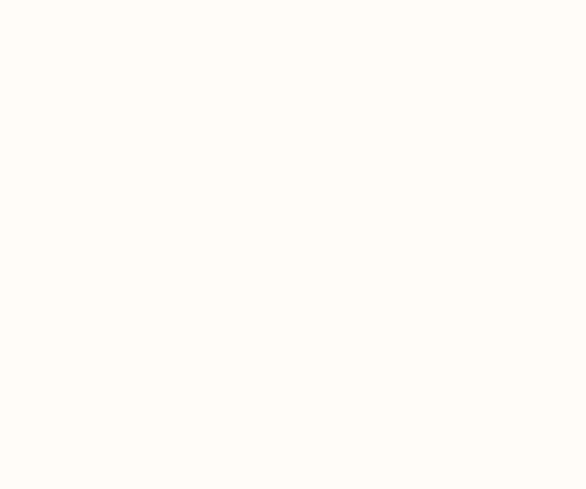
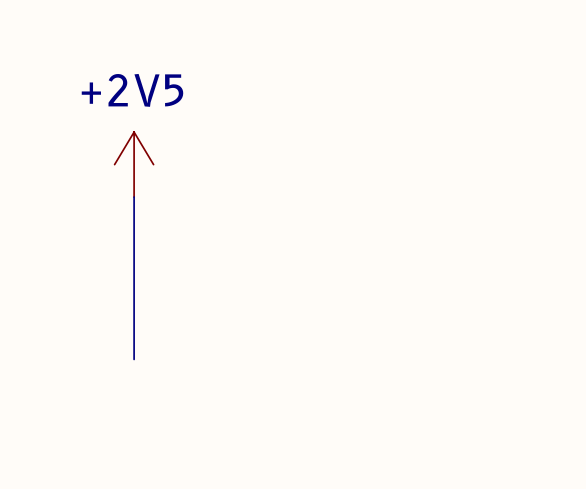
power symbol: none -> +2V5 (134, 164)
wire: none -> (134, 197) (134, 359)

